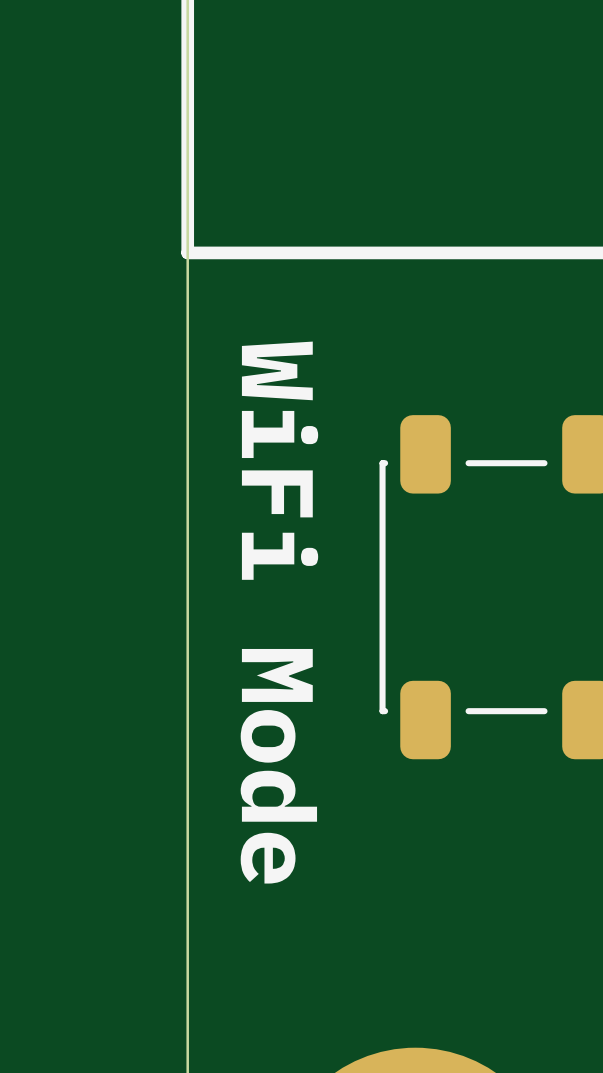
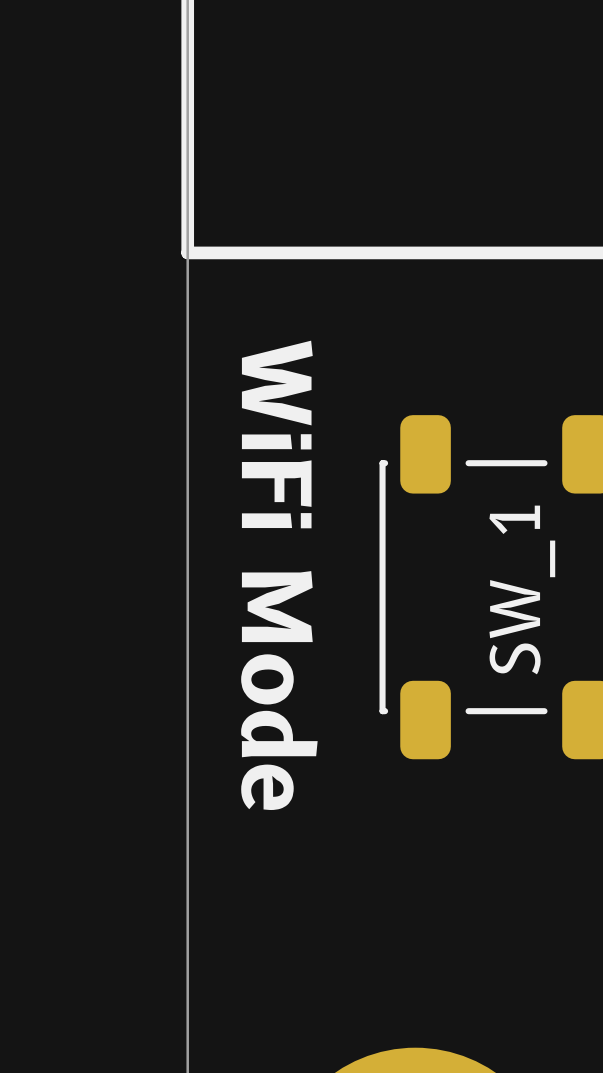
SW_1 name: none -> SW_1 (522, 589)

